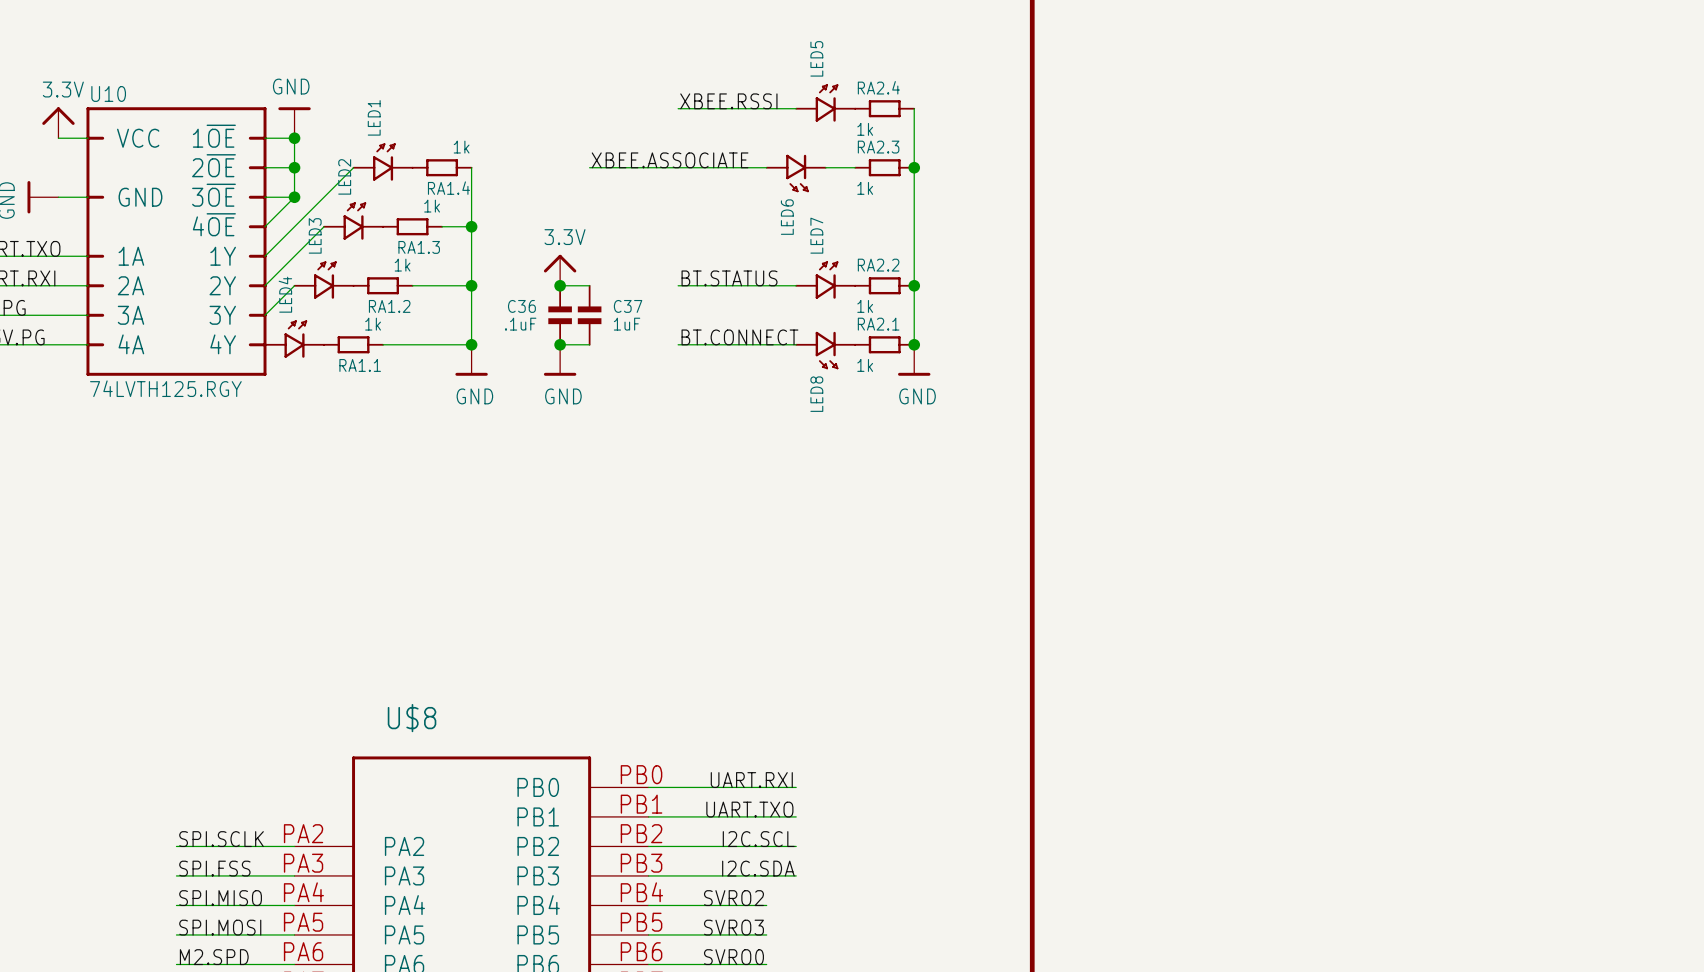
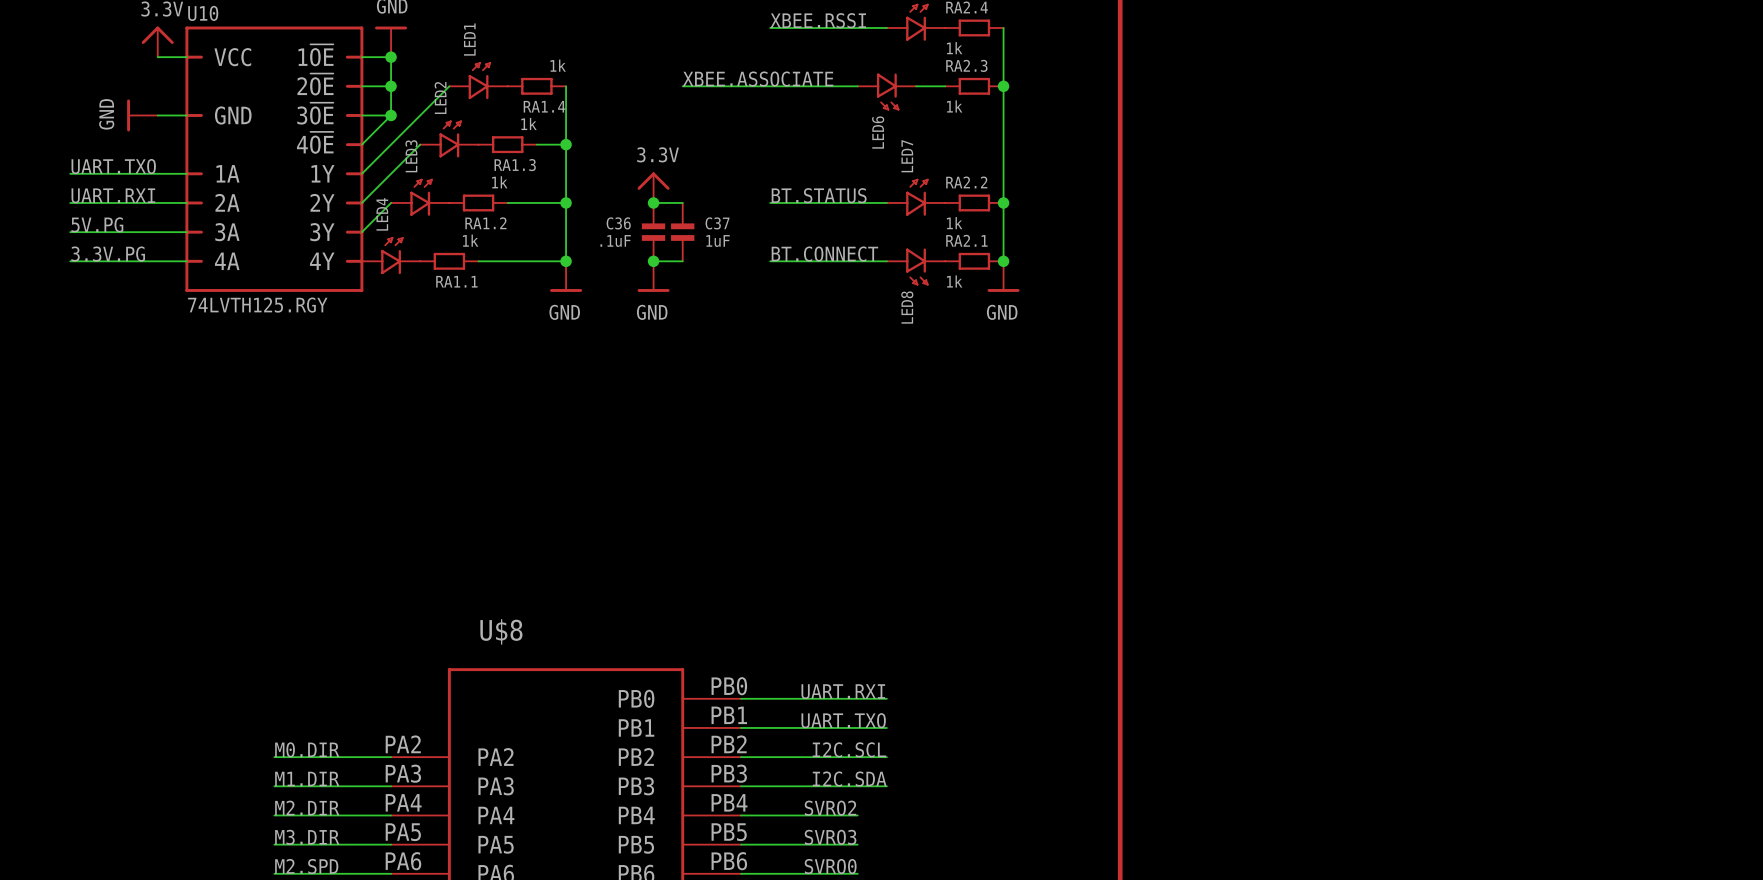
label: SPI.SCLK (221, 839) -> M0.DIR (307, 749)
label: SPI.FSS (214, 868) -> M1.DIR (307, 779)
label: SPI.MISO (220, 898) -> M2.DIR (307, 808)
label: SPI.MOSI (220, 927) -> M3.DIR (307, 837)

